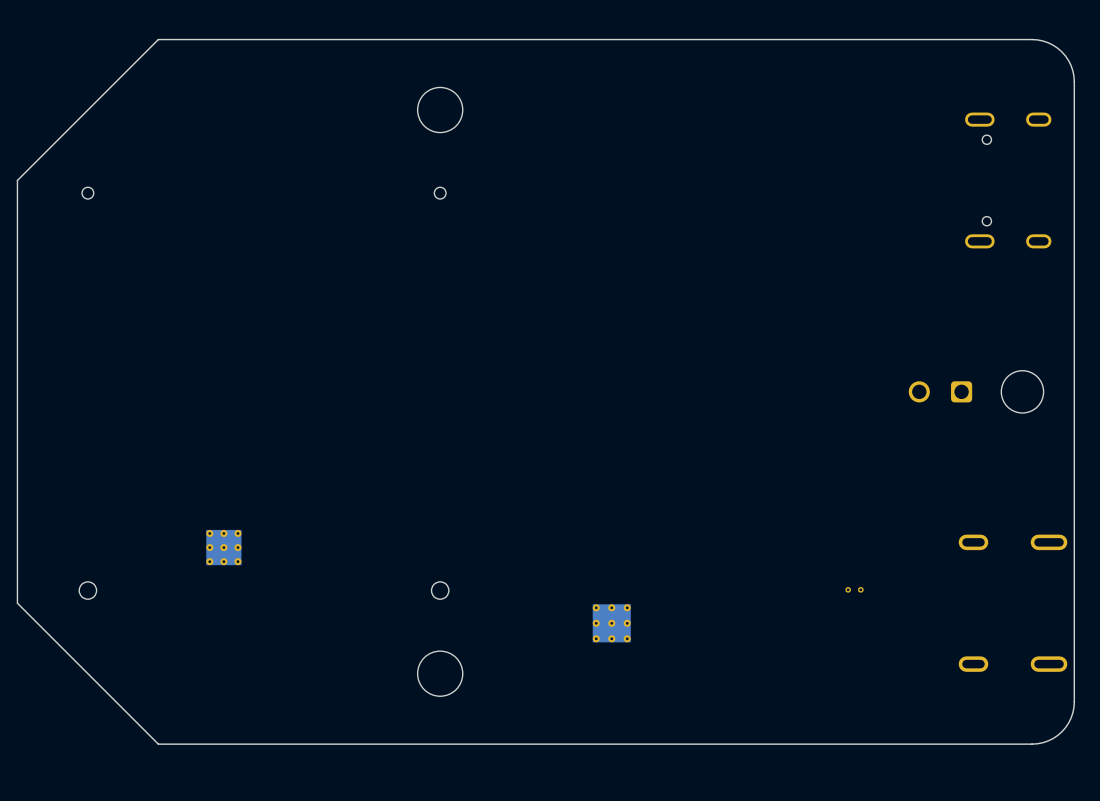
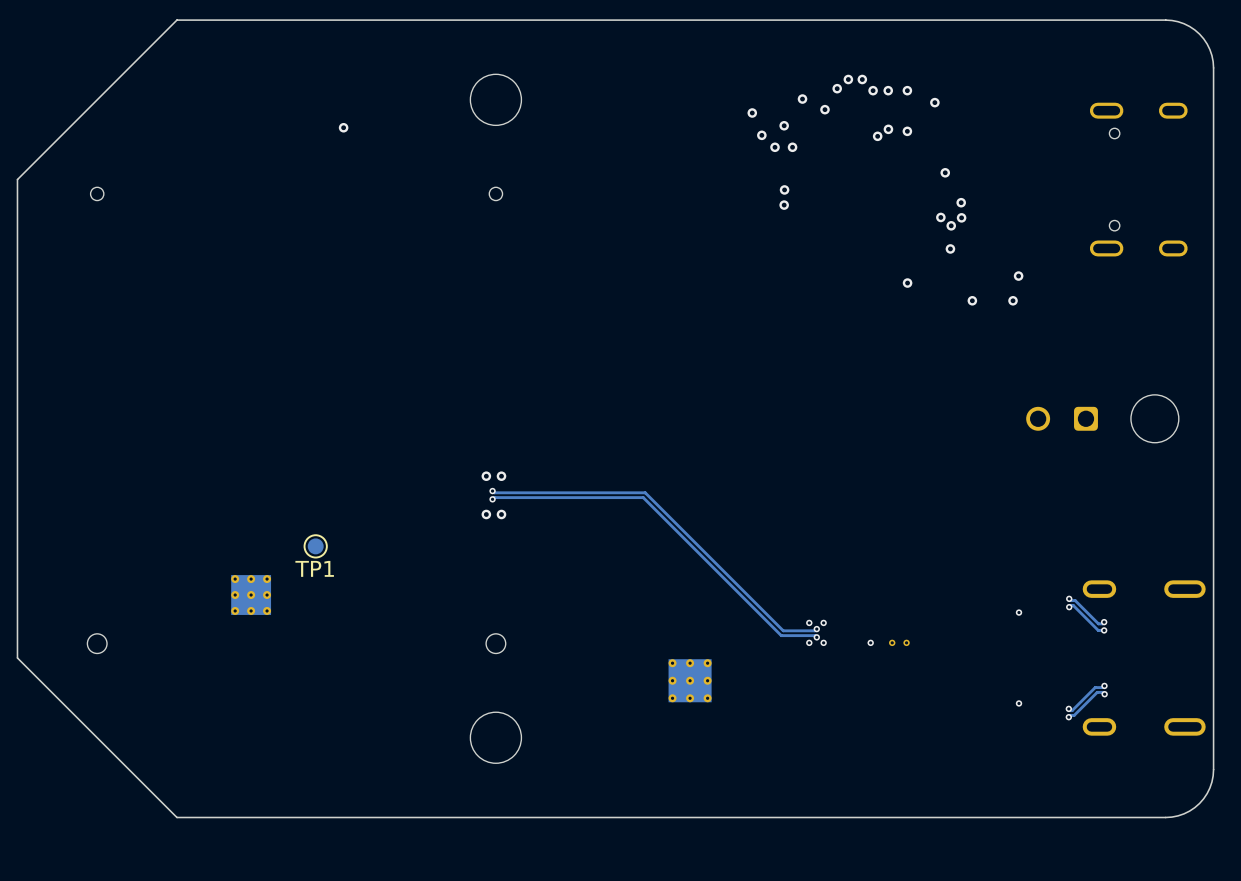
via: none -> (848, 79)
via: none -> (862, 79)
via: none -> (837, 88)
via: none -> (873, 90)
via: none -> (888, 90)
via: none -> (907, 90)
via: none -> (802, 99)
via: none -> (934, 102)
via: none -> (824, 109)
via: none -> (752, 112)
via: none -> (784, 125)
via: none -> (343, 127)
via: none -> (888, 129)
via: none -> (907, 131)
via: none -> (761, 135)
via: none -> (877, 136)
via: none -> (775, 147)
via: none -> (792, 147)
via: none -> (945, 172)
via: none -> (784, 189)
via: none -> (961, 202)
via: none -> (784, 205)
via: none -> (940, 217)
via: none -> (961, 217)
via: none -> (951, 225)
via: none -> (950, 248)
via: none -> (1018, 276)
via: none -> (907, 283)
via: none -> (972, 300)
via: none -> (1013, 300)
via: none -> (486, 476)
via: none -> (501, 476)
track: none -> (492, 491) (494, 492) (645, 492) (783, 630) (815, 630) (816, 629)
via: none -> (492, 491)
track: none -> (492, 499) (494, 497) (643, 497) (781, 635) (815, 635) (816, 637)
via: none -> (492, 499)
via: none -> (486, 514)
via: none -> (501, 514)
TP1: none -> (315, 546)
track: none -> (1069, 598) (1075, 600) (1098, 623) (1104, 622)
via: none -> (1069, 598)
track: none -> (1069, 607) (1073, 605) (1098, 630) (1104, 630)
via: none -> (1069, 607)
via: none -> (1019, 612)
via: none -> (1104, 622)
via: none -> (809, 622)
via: none -> (823, 622)
via: none -> (816, 629)
via: none -> (1104, 630)
via: none -> (816, 637)
via: none -> (809, 642)
via: none -> (823, 642)
via: none -> (870, 642)
part position: (854, 589) -> (899, 642)
track: none -> (1104, 685) (1095, 687) (1072, 710) (1068, 708)
via: none -> (1104, 685)
track: none -> (1104, 694) (1097, 692) (1074, 715) (1068, 717)
via: none -> (1104, 694)
via: none -> (1019, 703)
via: none -> (1068, 708)
via: none -> (1068, 717)

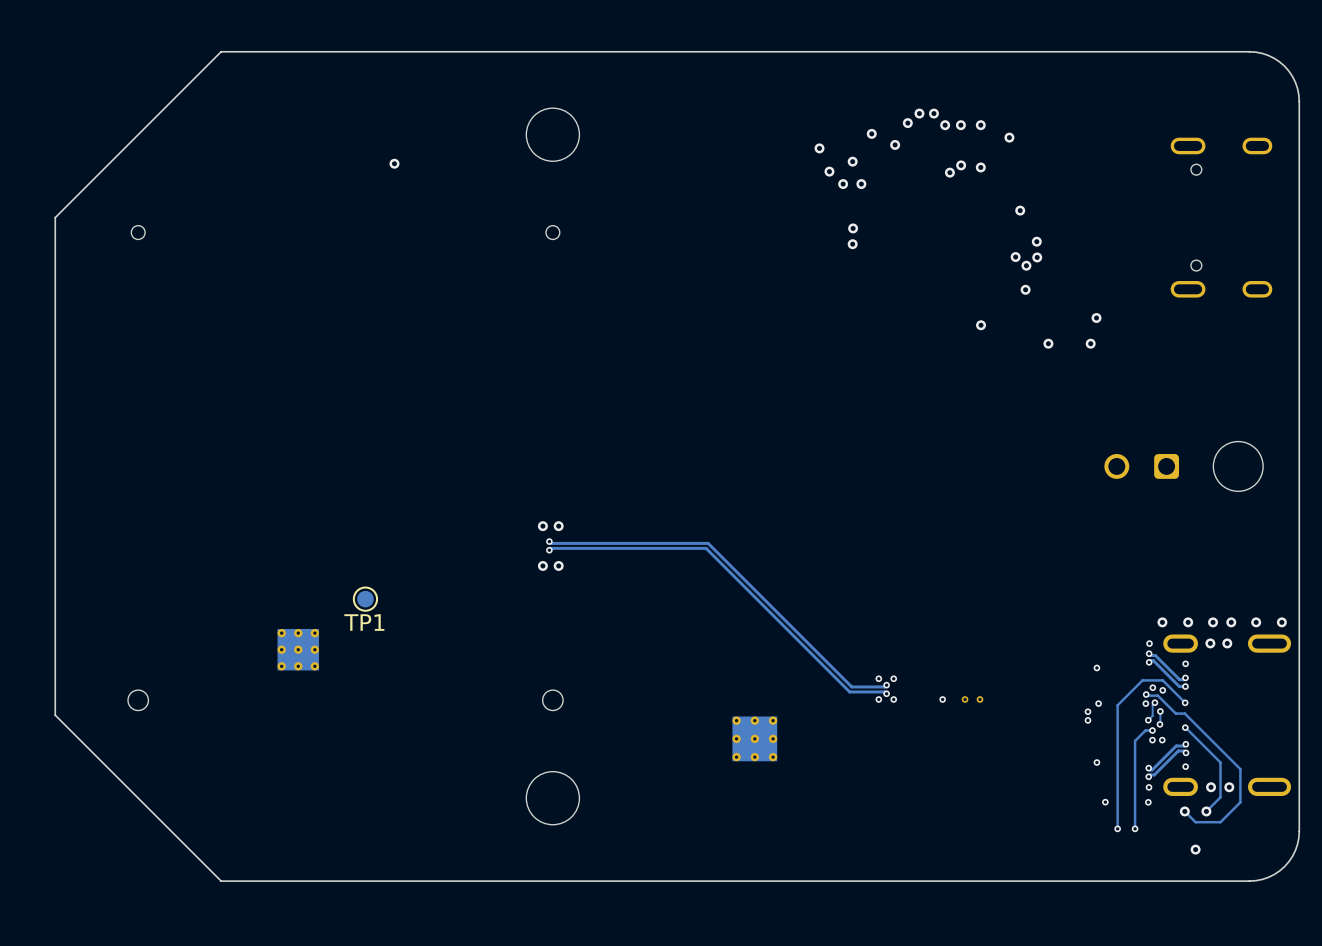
via: none -> (1162, 622)
via: none -> (1188, 622)
via: none -> (1213, 622)
via: none -> (1231, 622)
via: none -> (1256, 622)
via: none -> (1281, 622)
via: none -> (1210, 643)
via: none -> (1227, 643)
via: none -> (1149, 643)
via: none -> (1185, 663)
via: none -> (1152, 687)
via: none -> (1162, 690)
track: none -> (1146, 694) (1157, 695) (1175, 713) (1184, 713) (1240, 769) (1240, 802) (1220, 822) (1195, 822) (1184, 811)
via: none -> (1146, 694)
track: none -> (1154, 702) (1152, 704) (1152, 715) (1148, 720)
via: none -> (1154, 702)
via: none -> (1098, 703)
via: none -> (1145, 703)
track: none -> (1185, 702) (1162, 680) (1142, 680) (1117, 705) (1117, 828)
via: none -> (1185, 702)
via: none -> (1087, 711)
track: none -> (1160, 711) (1159, 724)
via: none -> (1160, 711)
via: none -> (1087, 720)
via: none -> (1148, 720)
via: none -> (1159, 724)
track: none -> (1185, 727) (1220, 762) (1220, 797) (1206, 811)
via: none -> (1185, 727)
track: none -> (1152, 730) (1145, 730) (1135, 740) (1135, 828)
via: none -> (1152, 730)
via: none -> (1152, 740)
via: none -> (1162, 740)
via: none -> (1185, 766)
via: none -> (1149, 787)
via: none -> (1211, 787)
via: none -> (1229, 787)
via: none -> (1105, 802)
via: none -> (1148, 802)
via: none -> (1184, 811)
via: none -> (1206, 811)
via: none -> (1117, 828)
via: none -> (1135, 828)
via: none -> (1195, 849)

